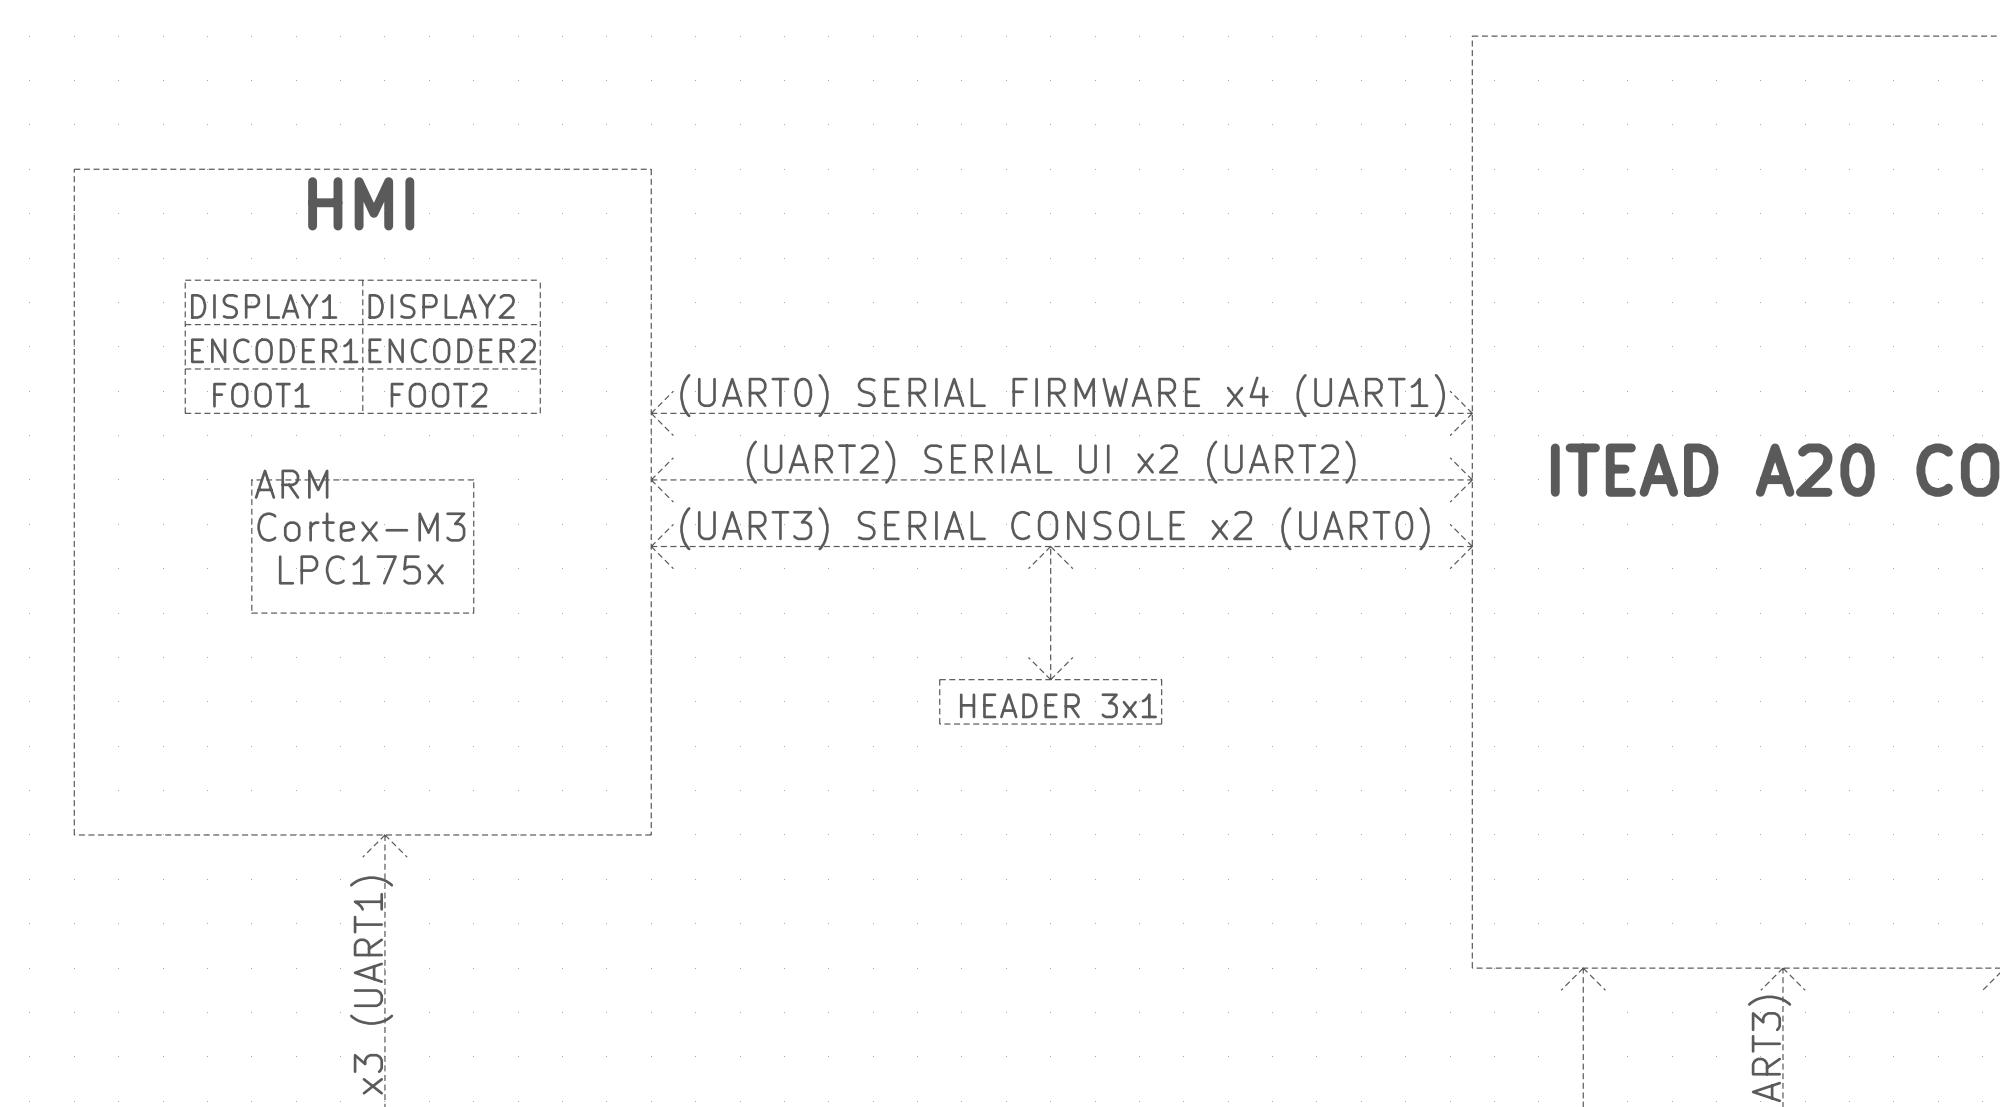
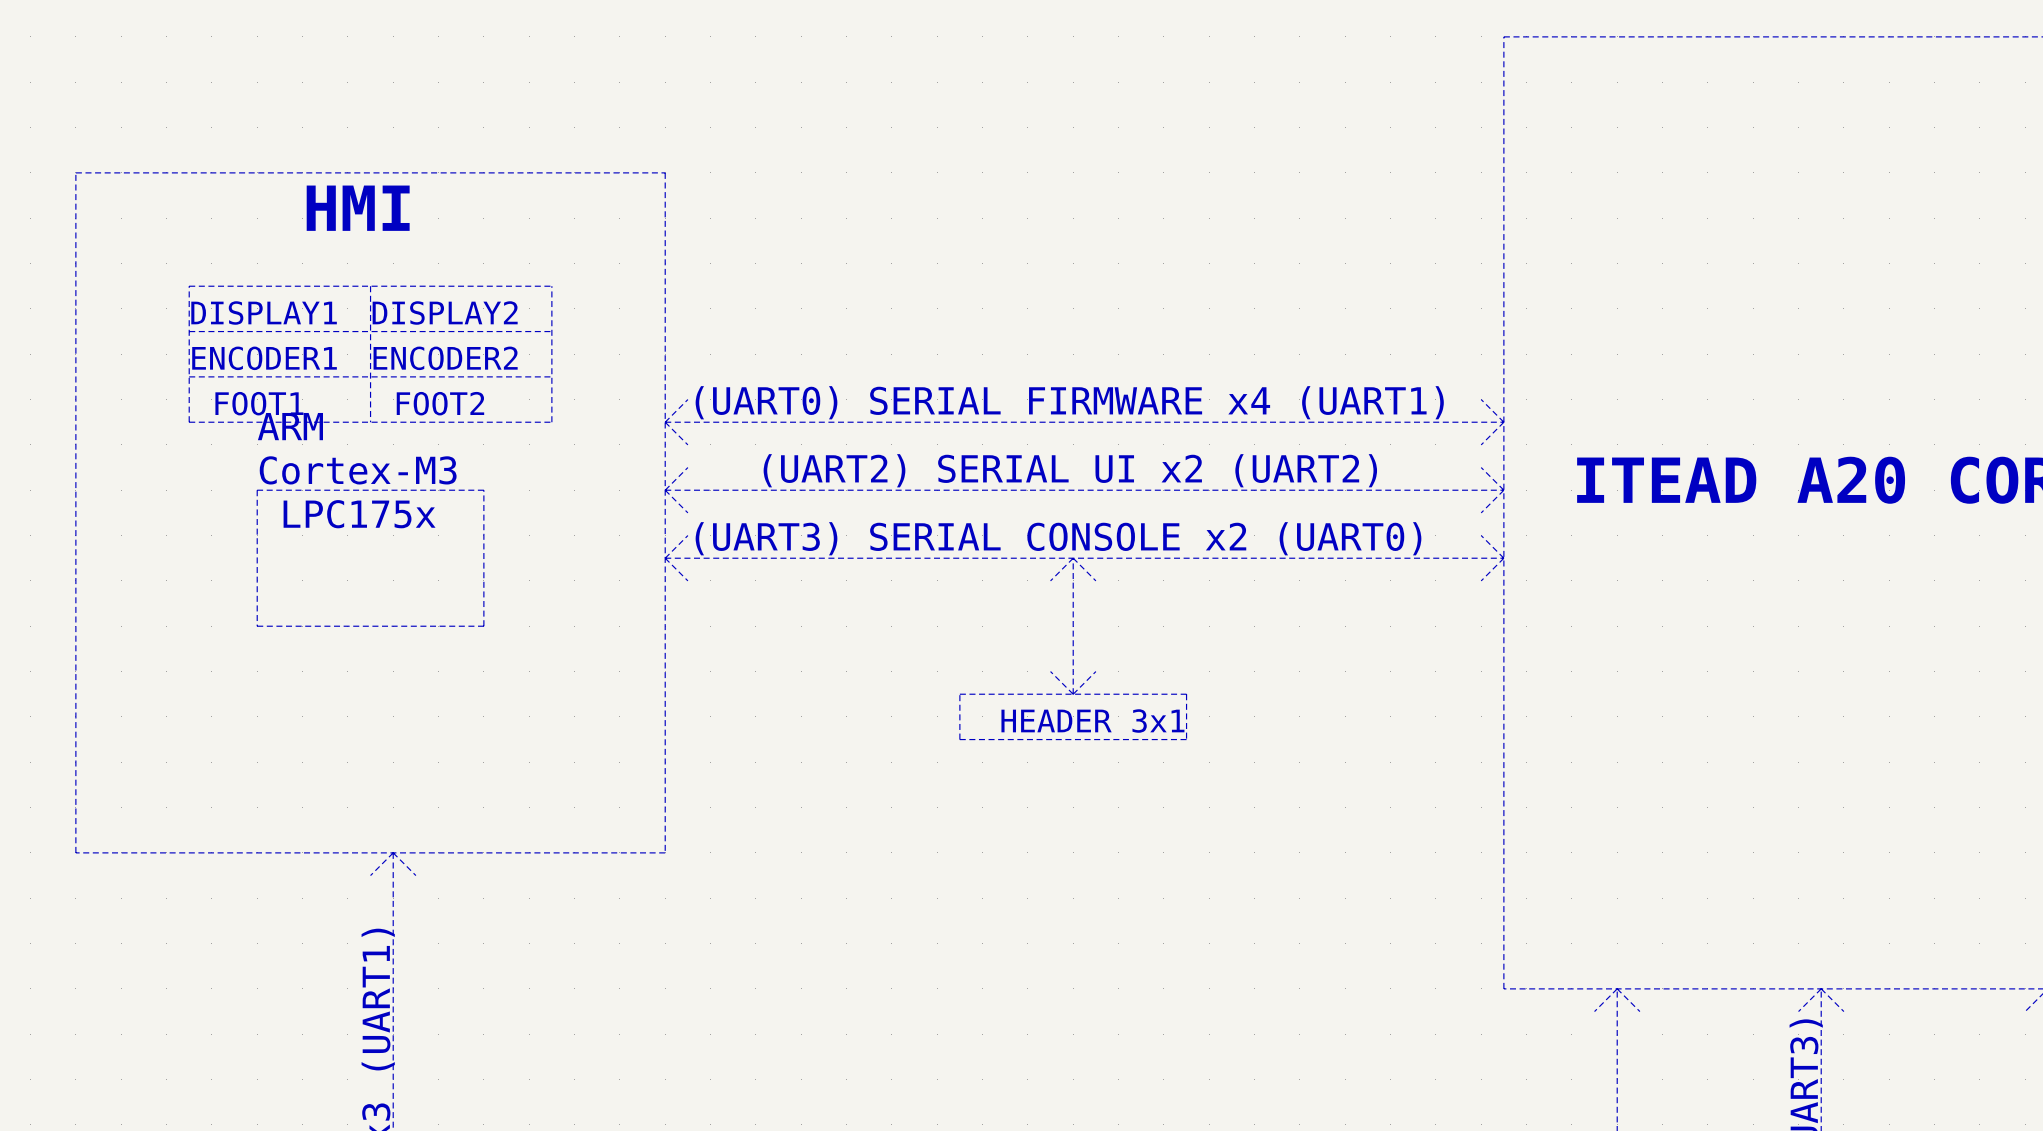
text position: ARM (291, 484) -> ARM (290, 426)
text position: Cortex-M3 (361, 527) -> Cortex-M3 (358, 470)
text position: LPC175x (361, 569) -> LPC175x (359, 514)

